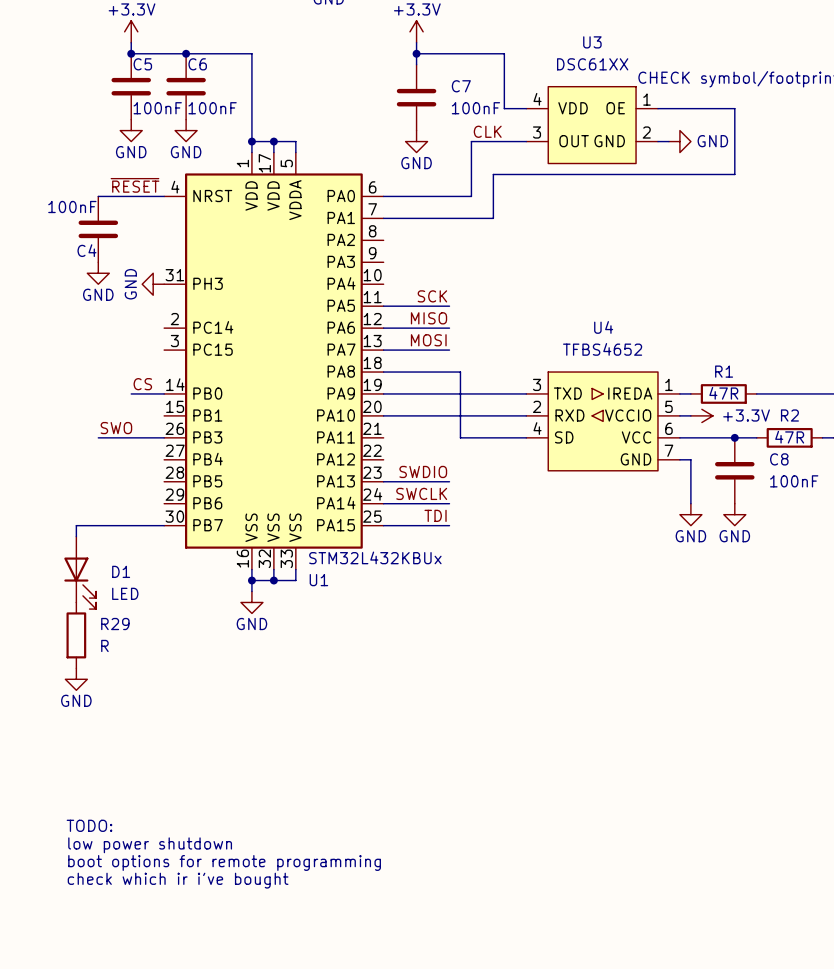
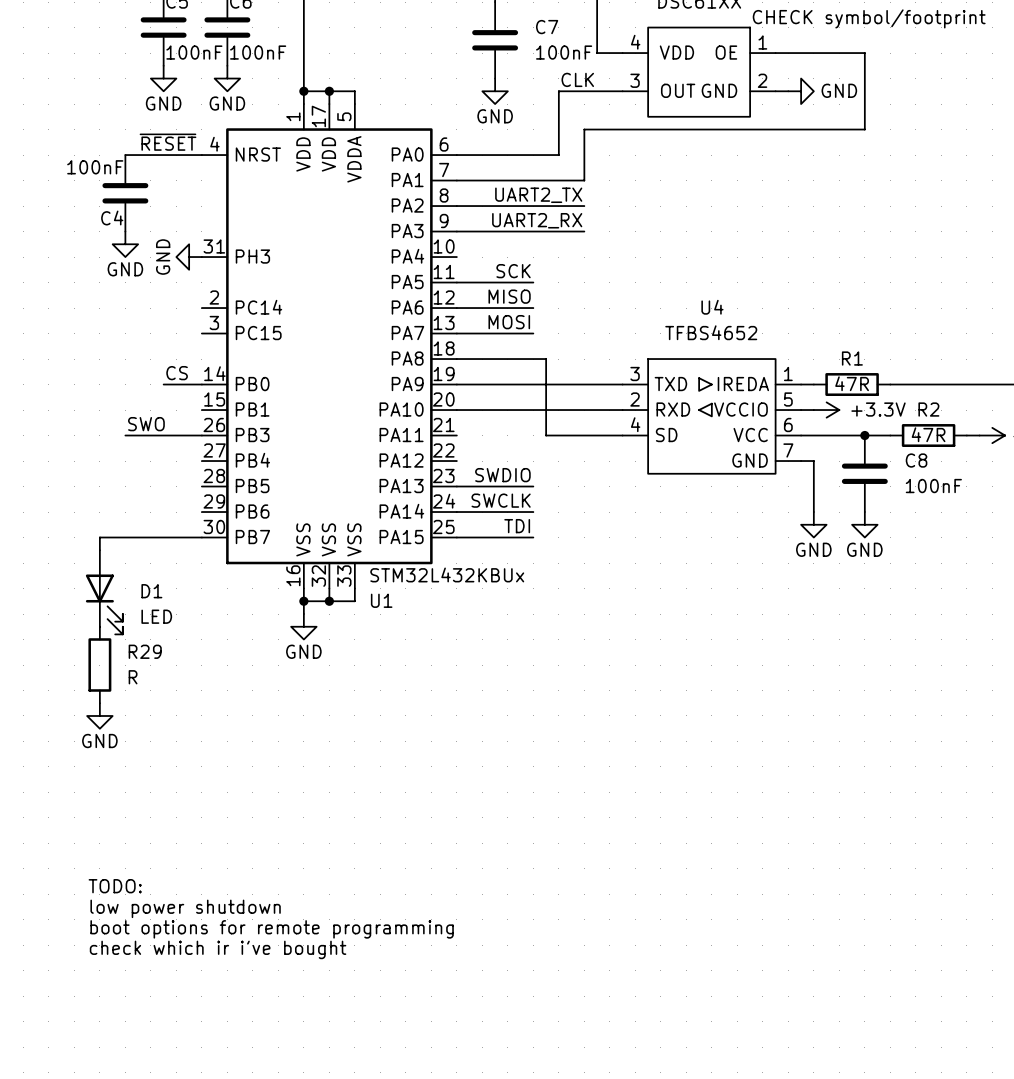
label: none -> UART2_TX (538, 195)
wire: none -> (456, 206) (584, 206)
label: none -> UART2_RX (537, 220)
wire: none -> (456, 231) (584, 231)

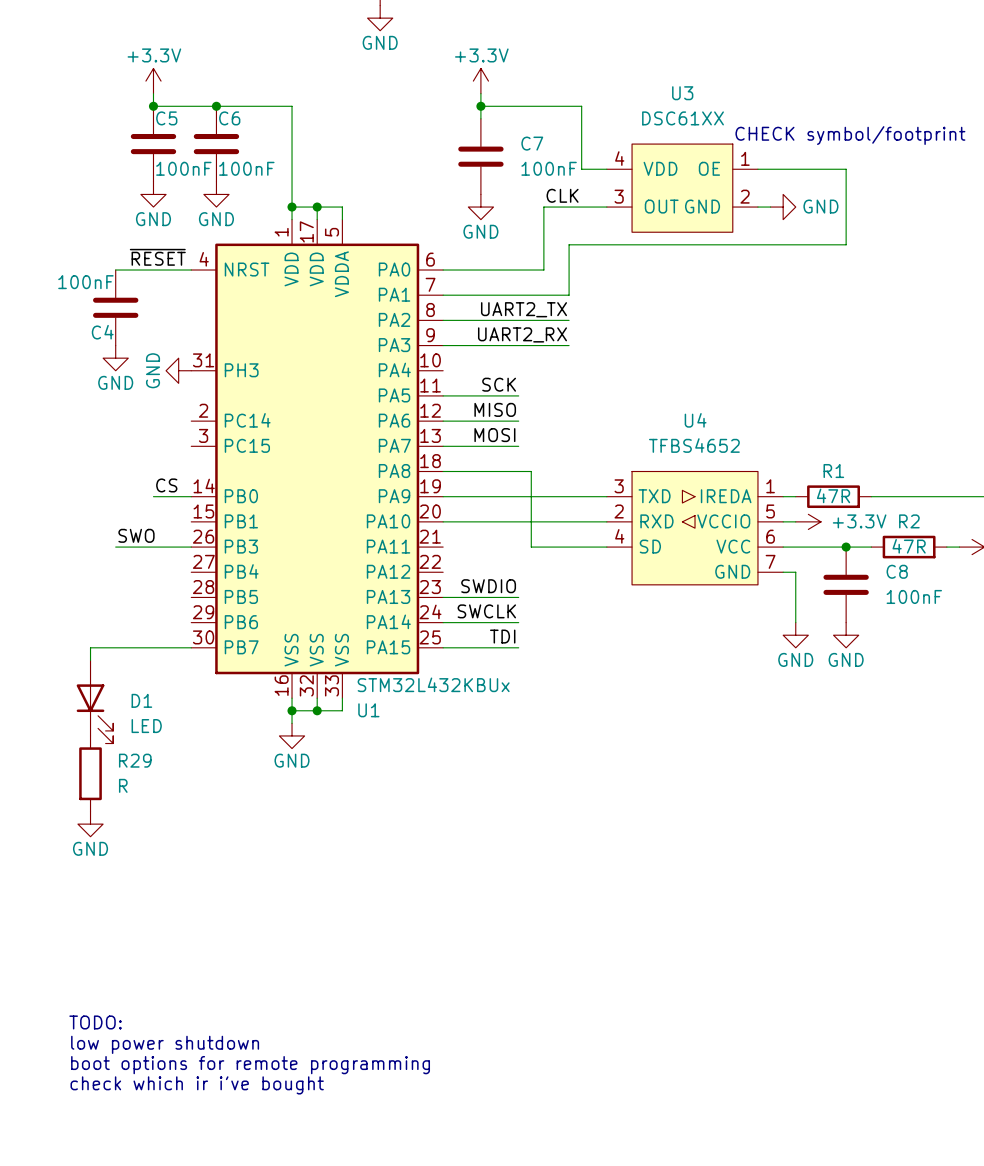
text position: TODO: (115, 886) -> TODO: (95, 1022)
text position: low power shutdown (185, 908) -> low power shutdown (165, 1044)
text position: boot options for remote programming (272, 929) -> boot options for remote programming (250, 1065)
text position: check which ir i've bought (218, 949) -> check which ir i've bought (197, 1085)

